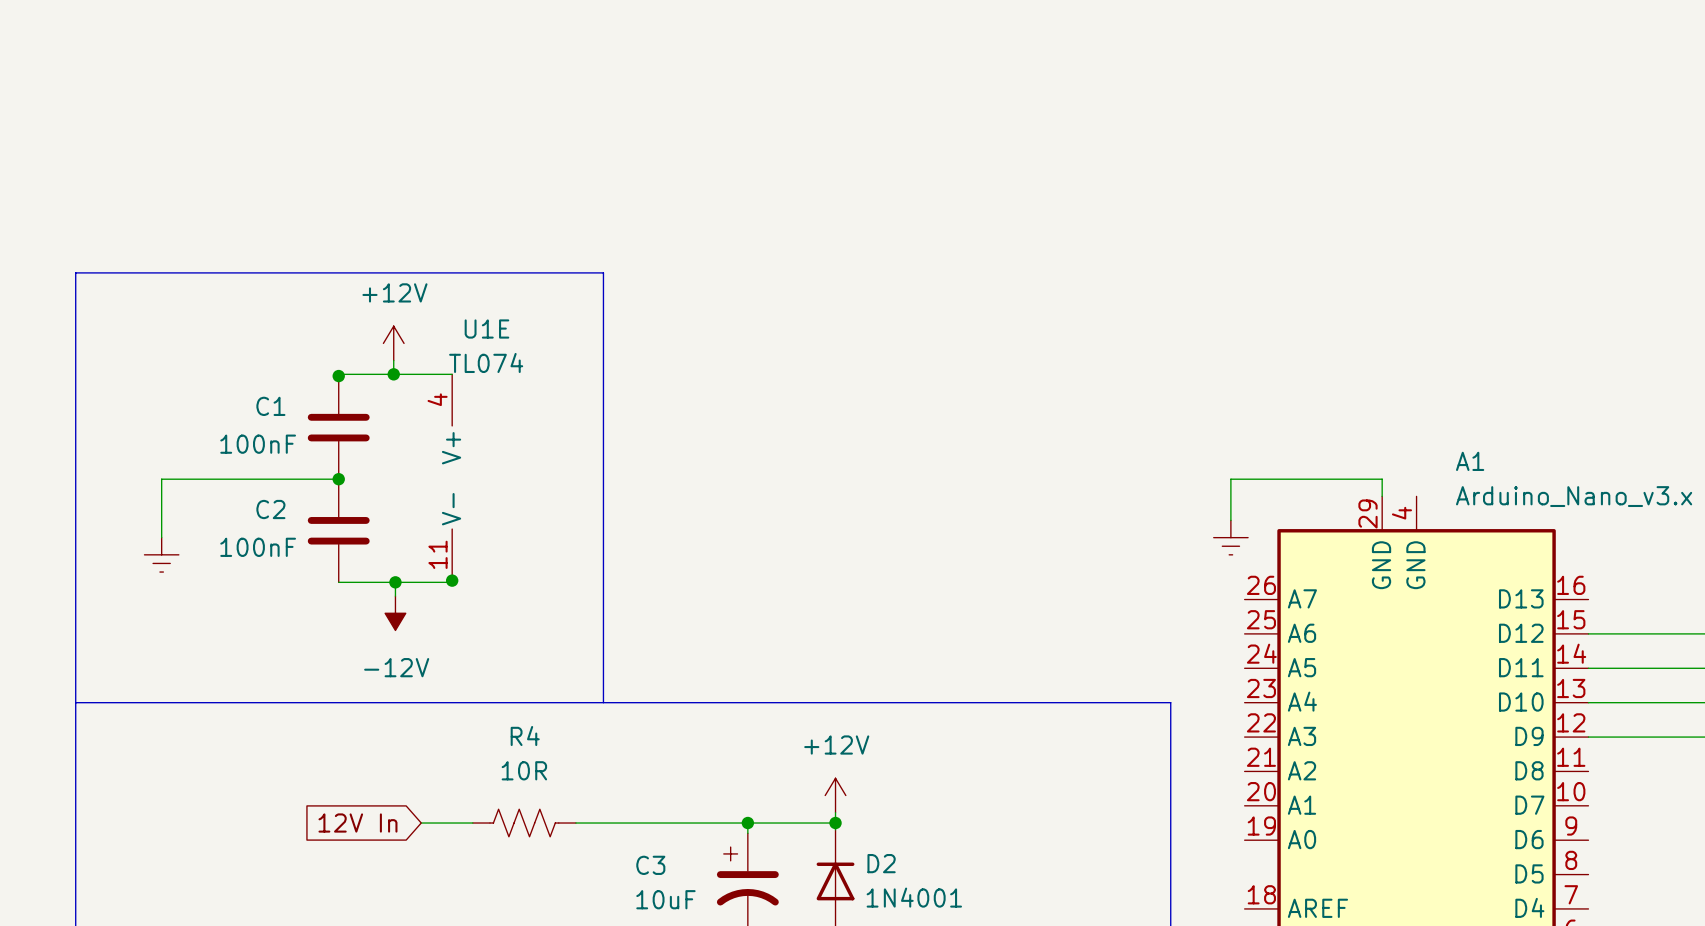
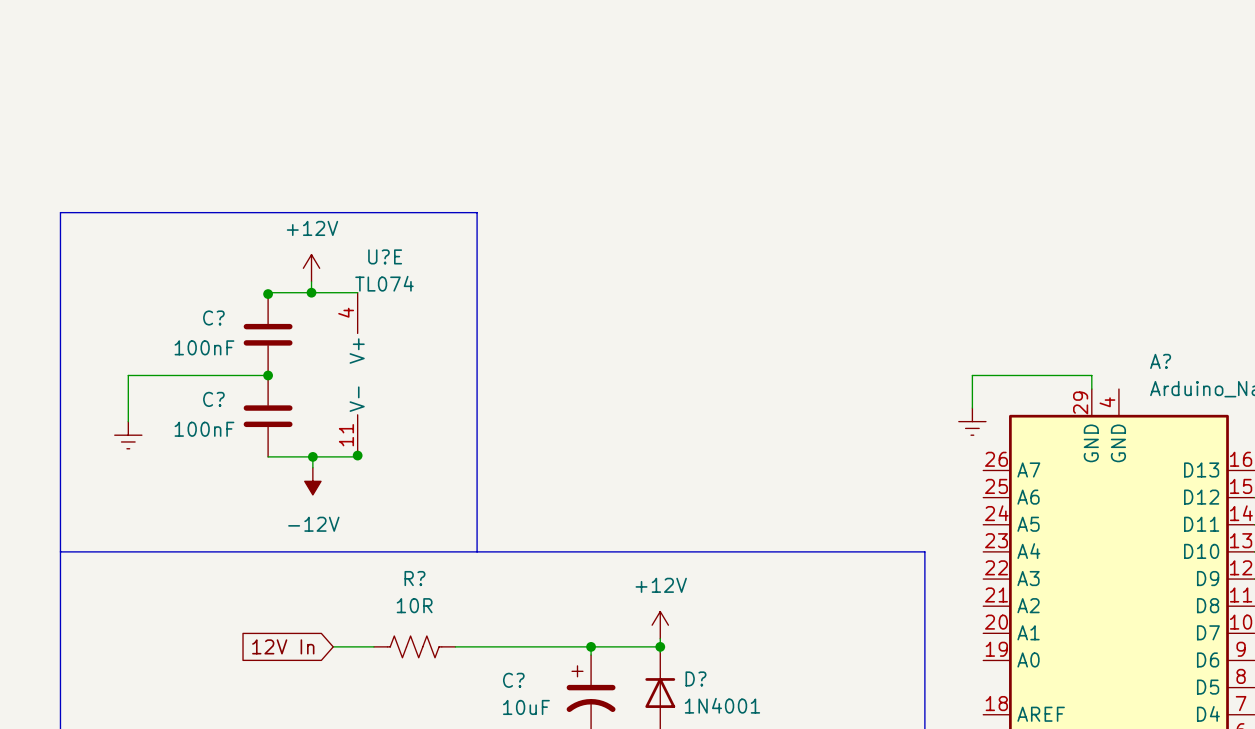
U1E name: U1E (486, 329) -> U?E (385, 256)
C1 name: C1 (270, 406) -> C? (213, 317)
A1 name: A1 (1470, 461) -> A? (1160, 361)
C2 name: C2 (270, 509) -> C? (213, 399)
R4 name: R4 (525, 736) -> R? (414, 578)
D2 name: D2 (881, 863) -> D? (695, 678)
C3 name: C3 (650, 865) -> C? (513, 680)

